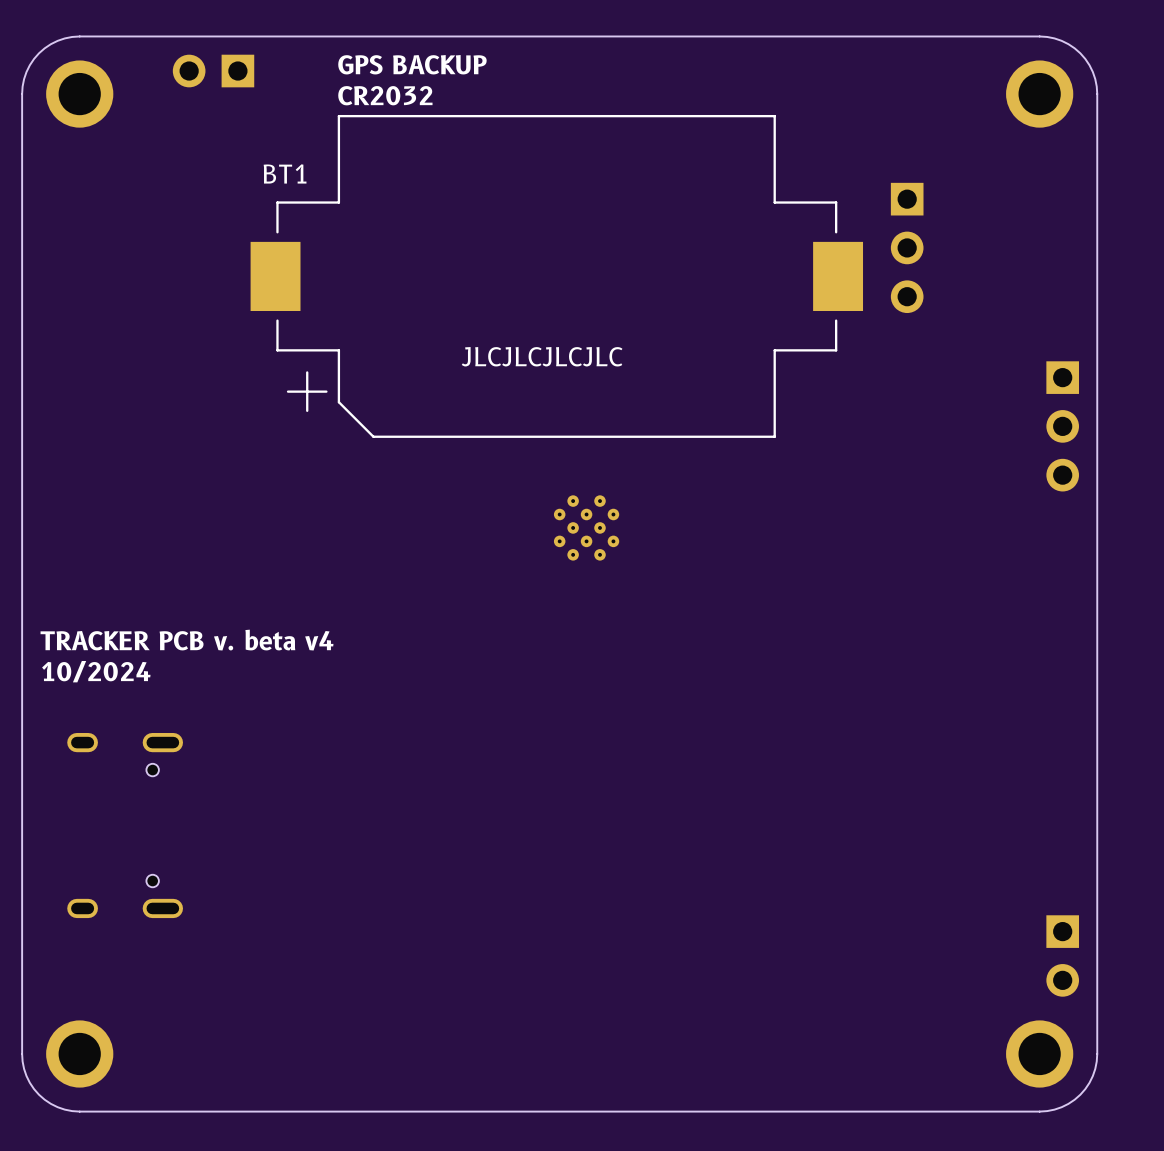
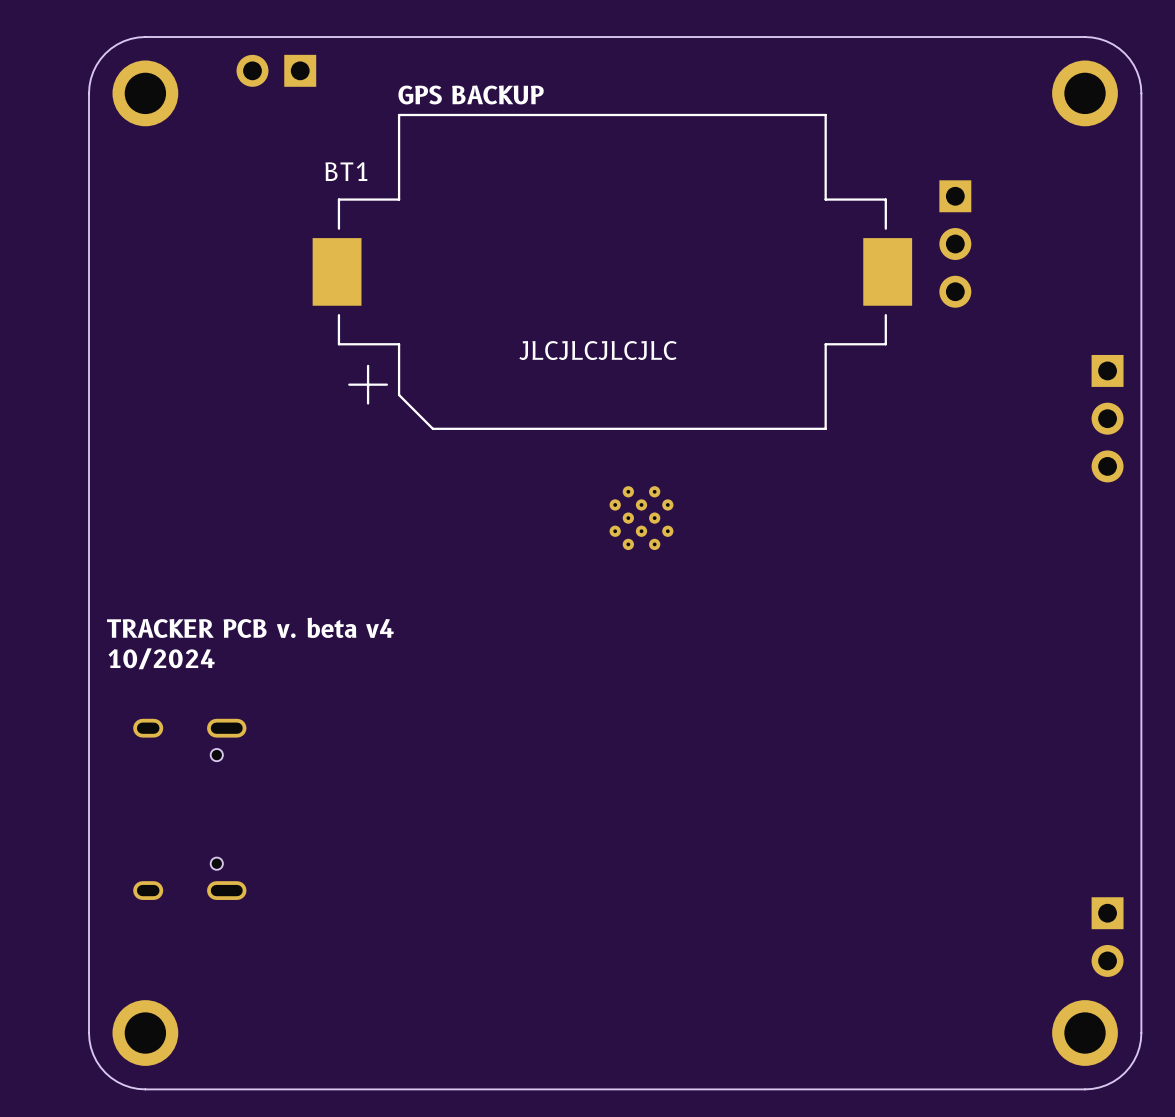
text: GPS BACKUP (412, 64) -> none
text: CR2032 (385, 95) -> GPS BACKUP (471, 94)

